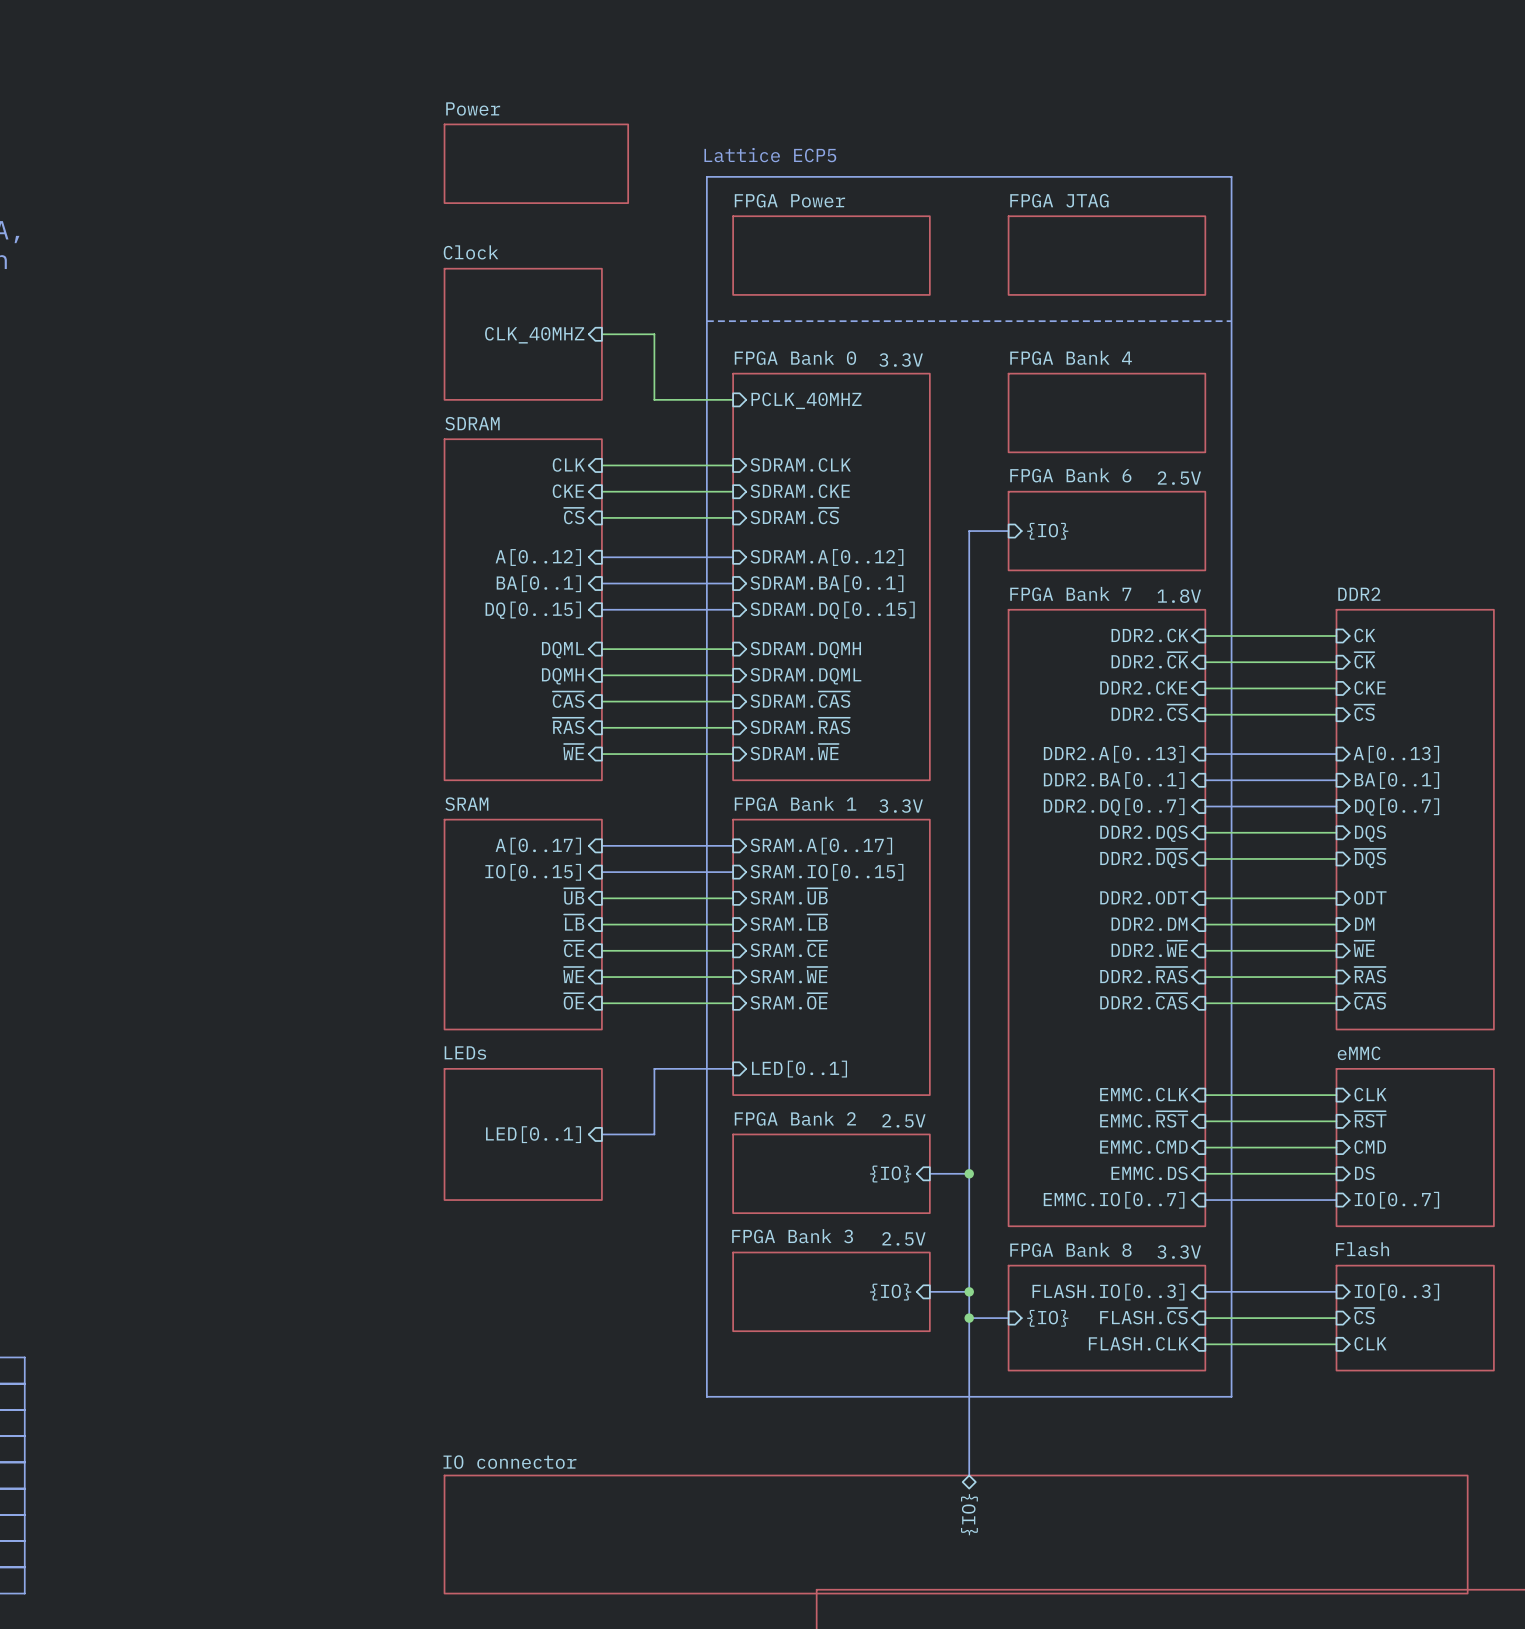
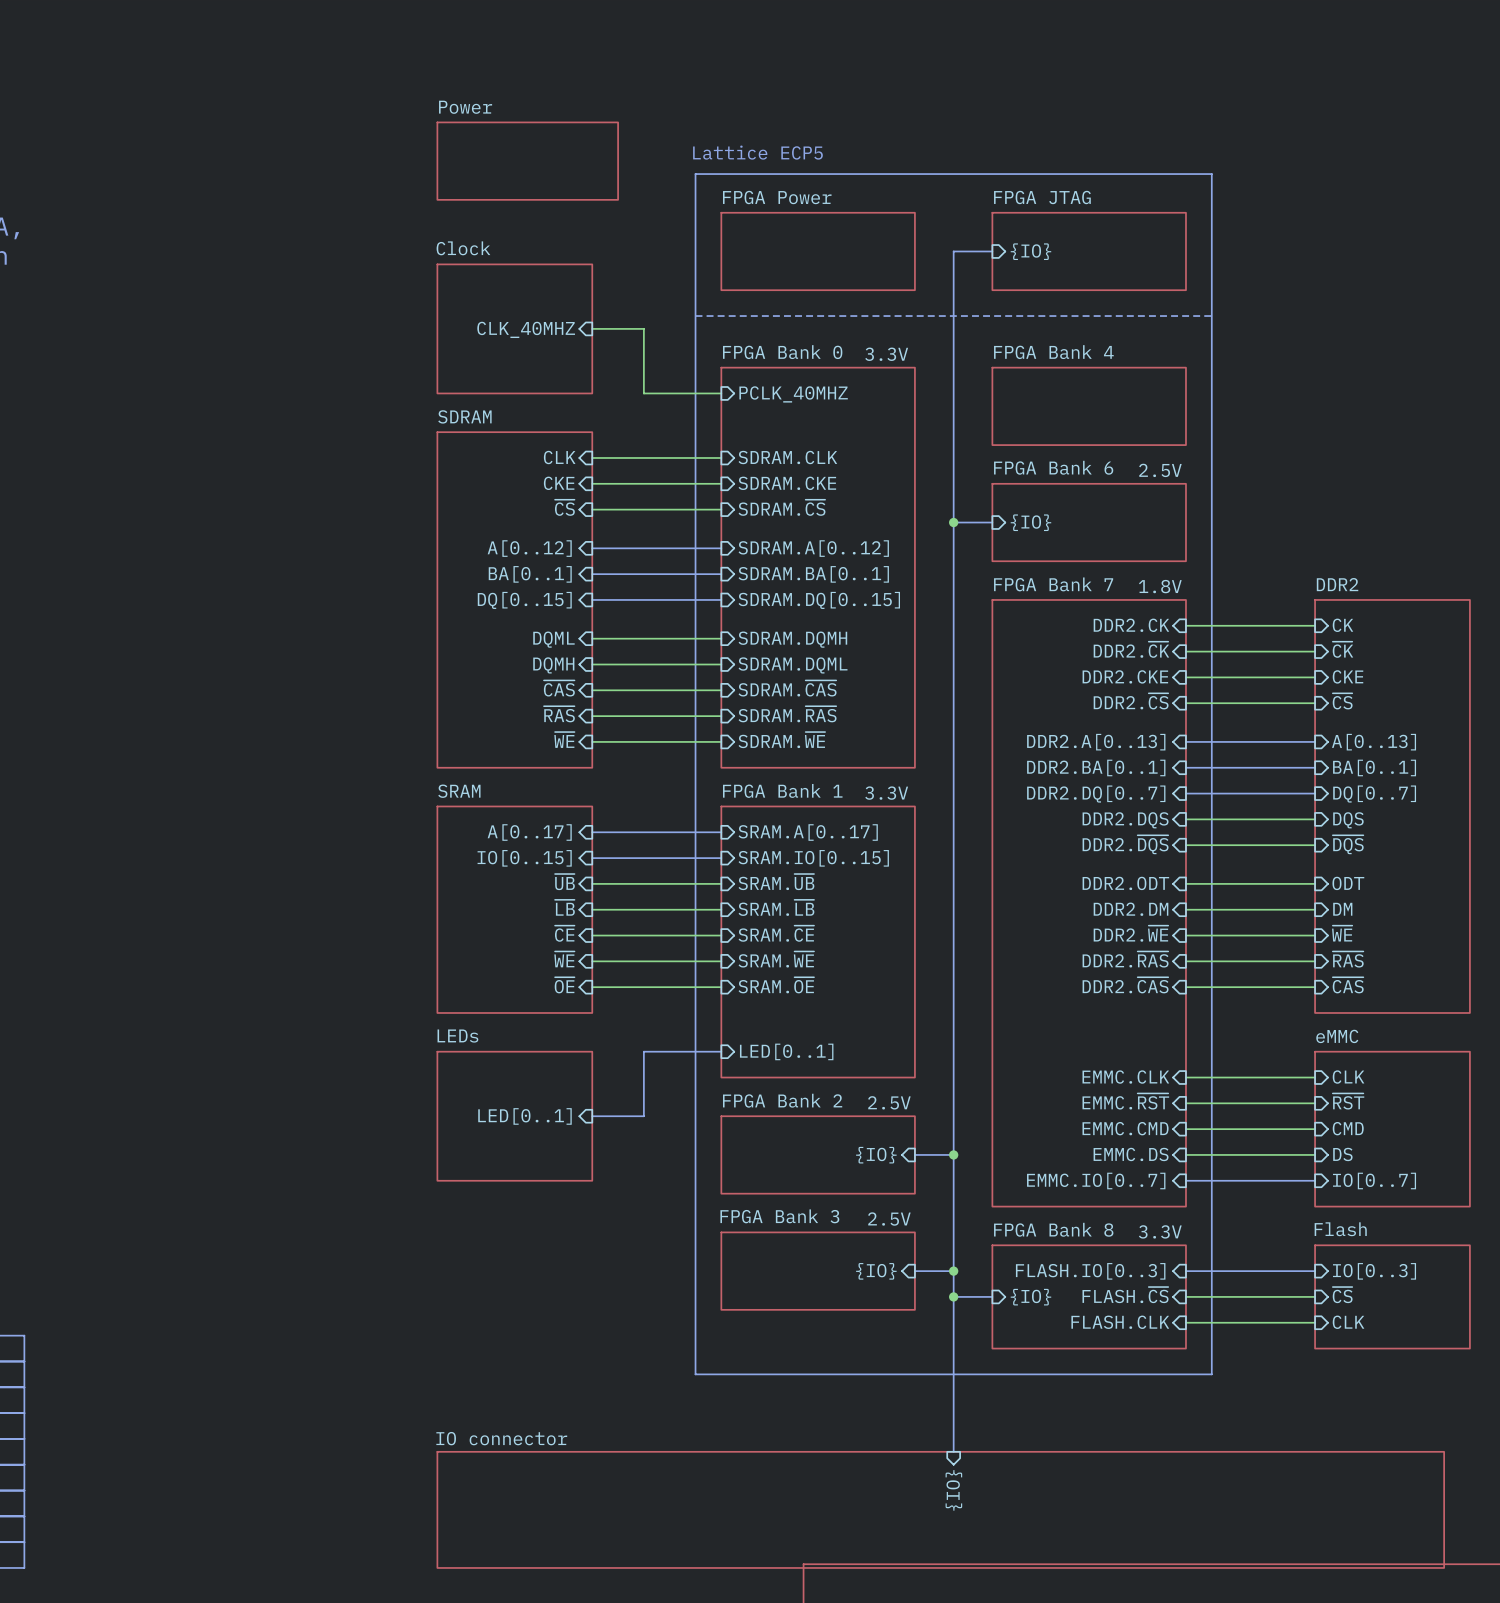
bus: none -> (992, 251) (953, 251) (953, 522)
sheet pin: none -> {IO} (1030, 251)
junction: none -> (953, 522)
sheet pin shape: bidirectional (969, 1514) -> input (953, 1490)

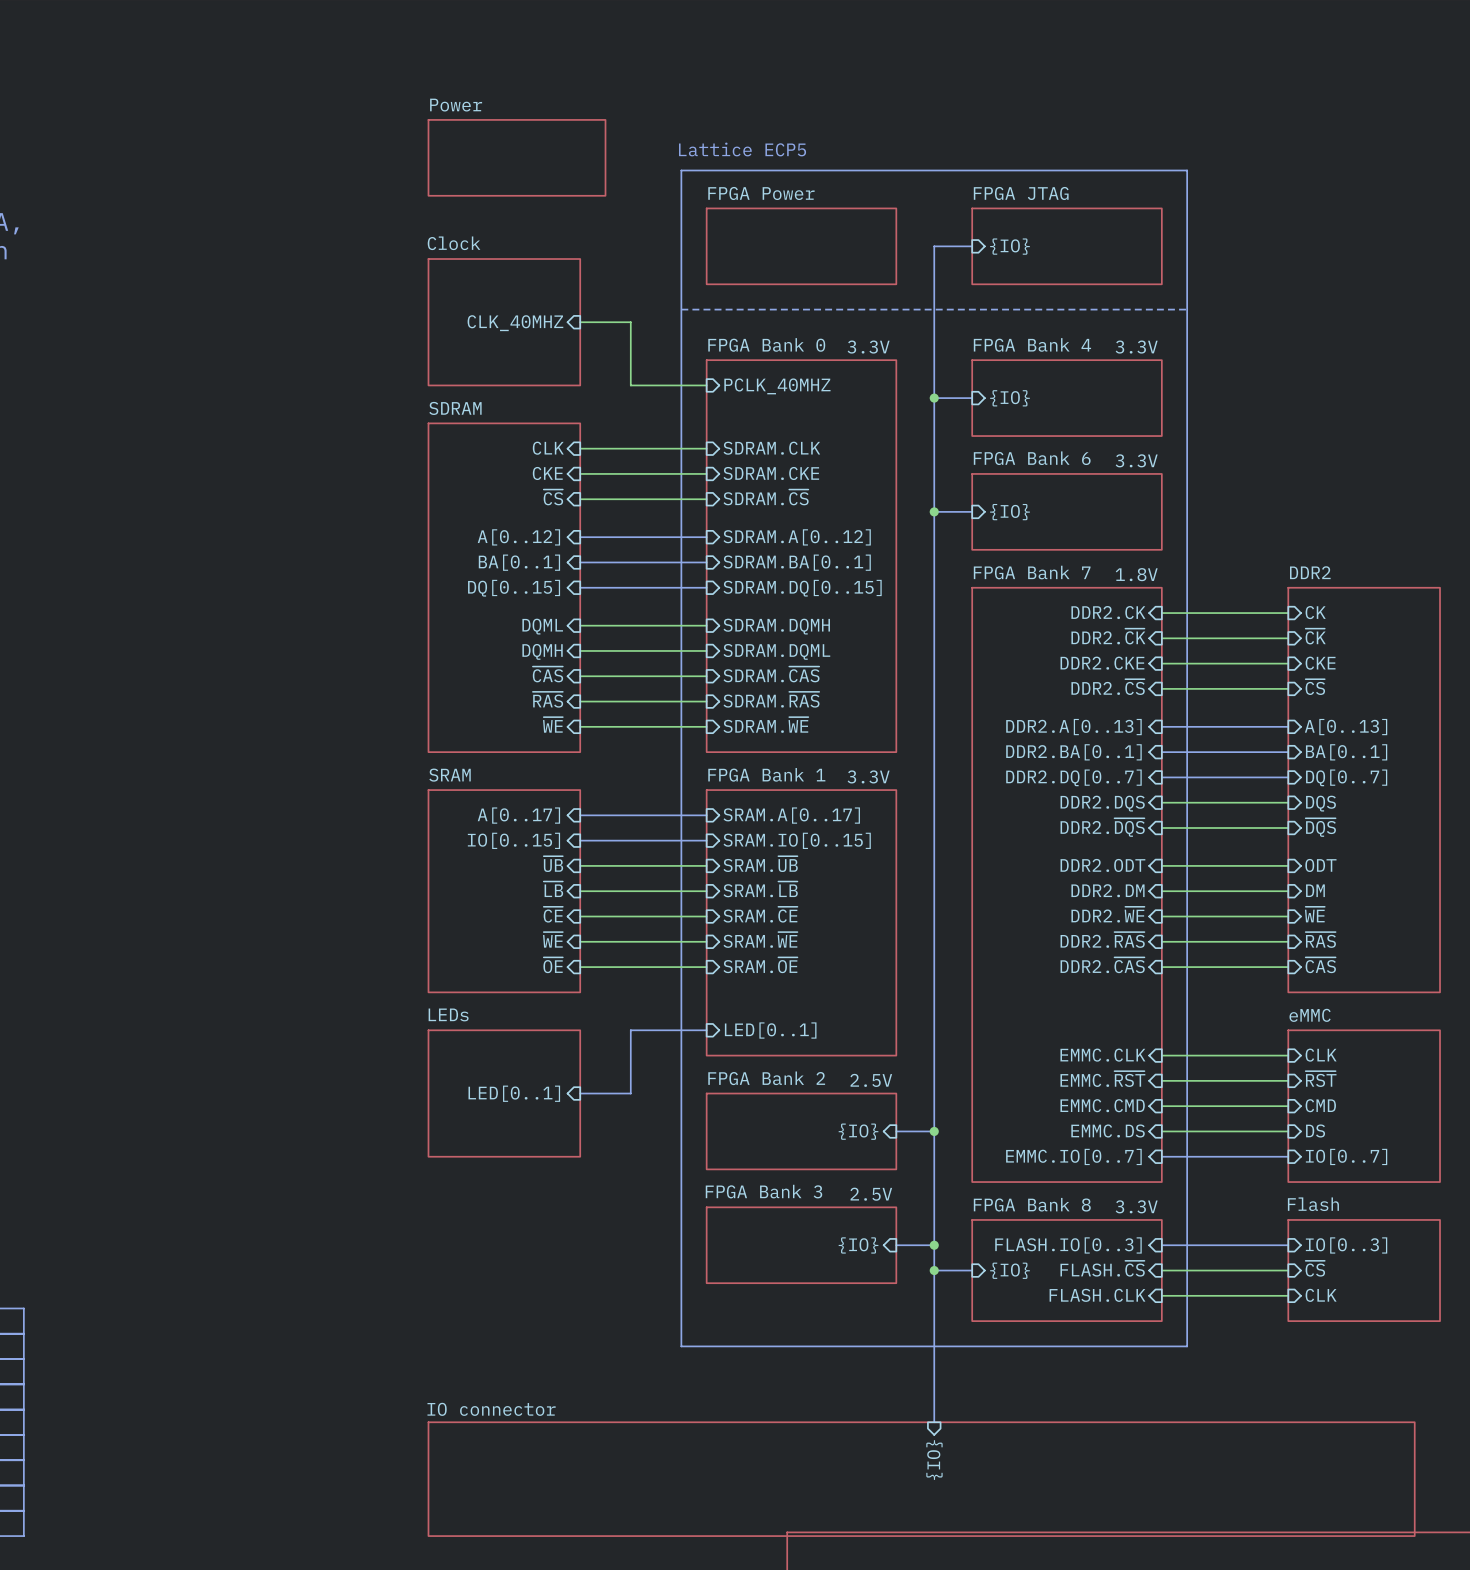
sheet FPGA Bank 4 text: none -> 3.3V (1136, 347)
bus: none -> (934, 398) (972, 398)
junction: none -> (934, 398)
sheet pin: none -> {IO} (1009, 398)
sheet FPGA Bank 6 text: 2.5V (1160, 470) -> 3.3V (1136, 460)

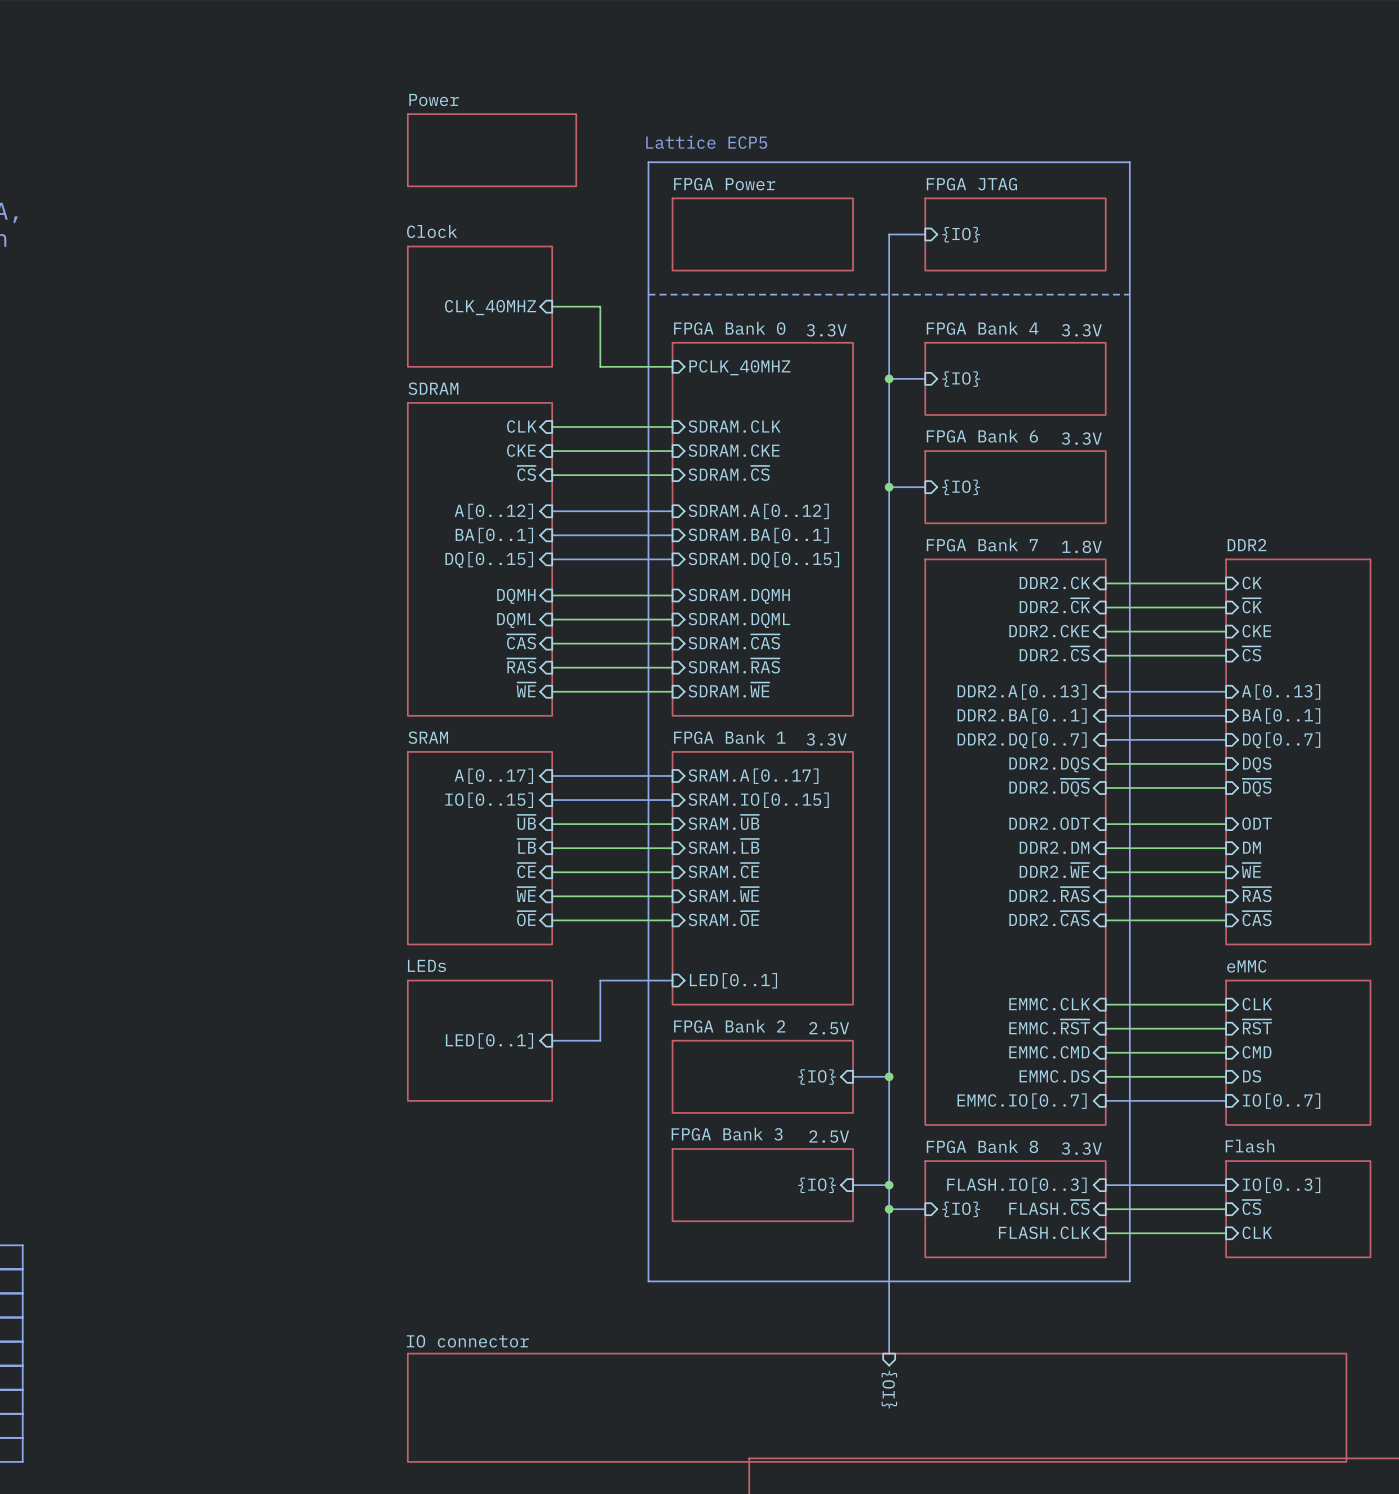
sheet pin: DQML (542, 626) -> DQMH (516, 596)
sheet pin: DQMH (542, 651) -> DQML (516, 620)

